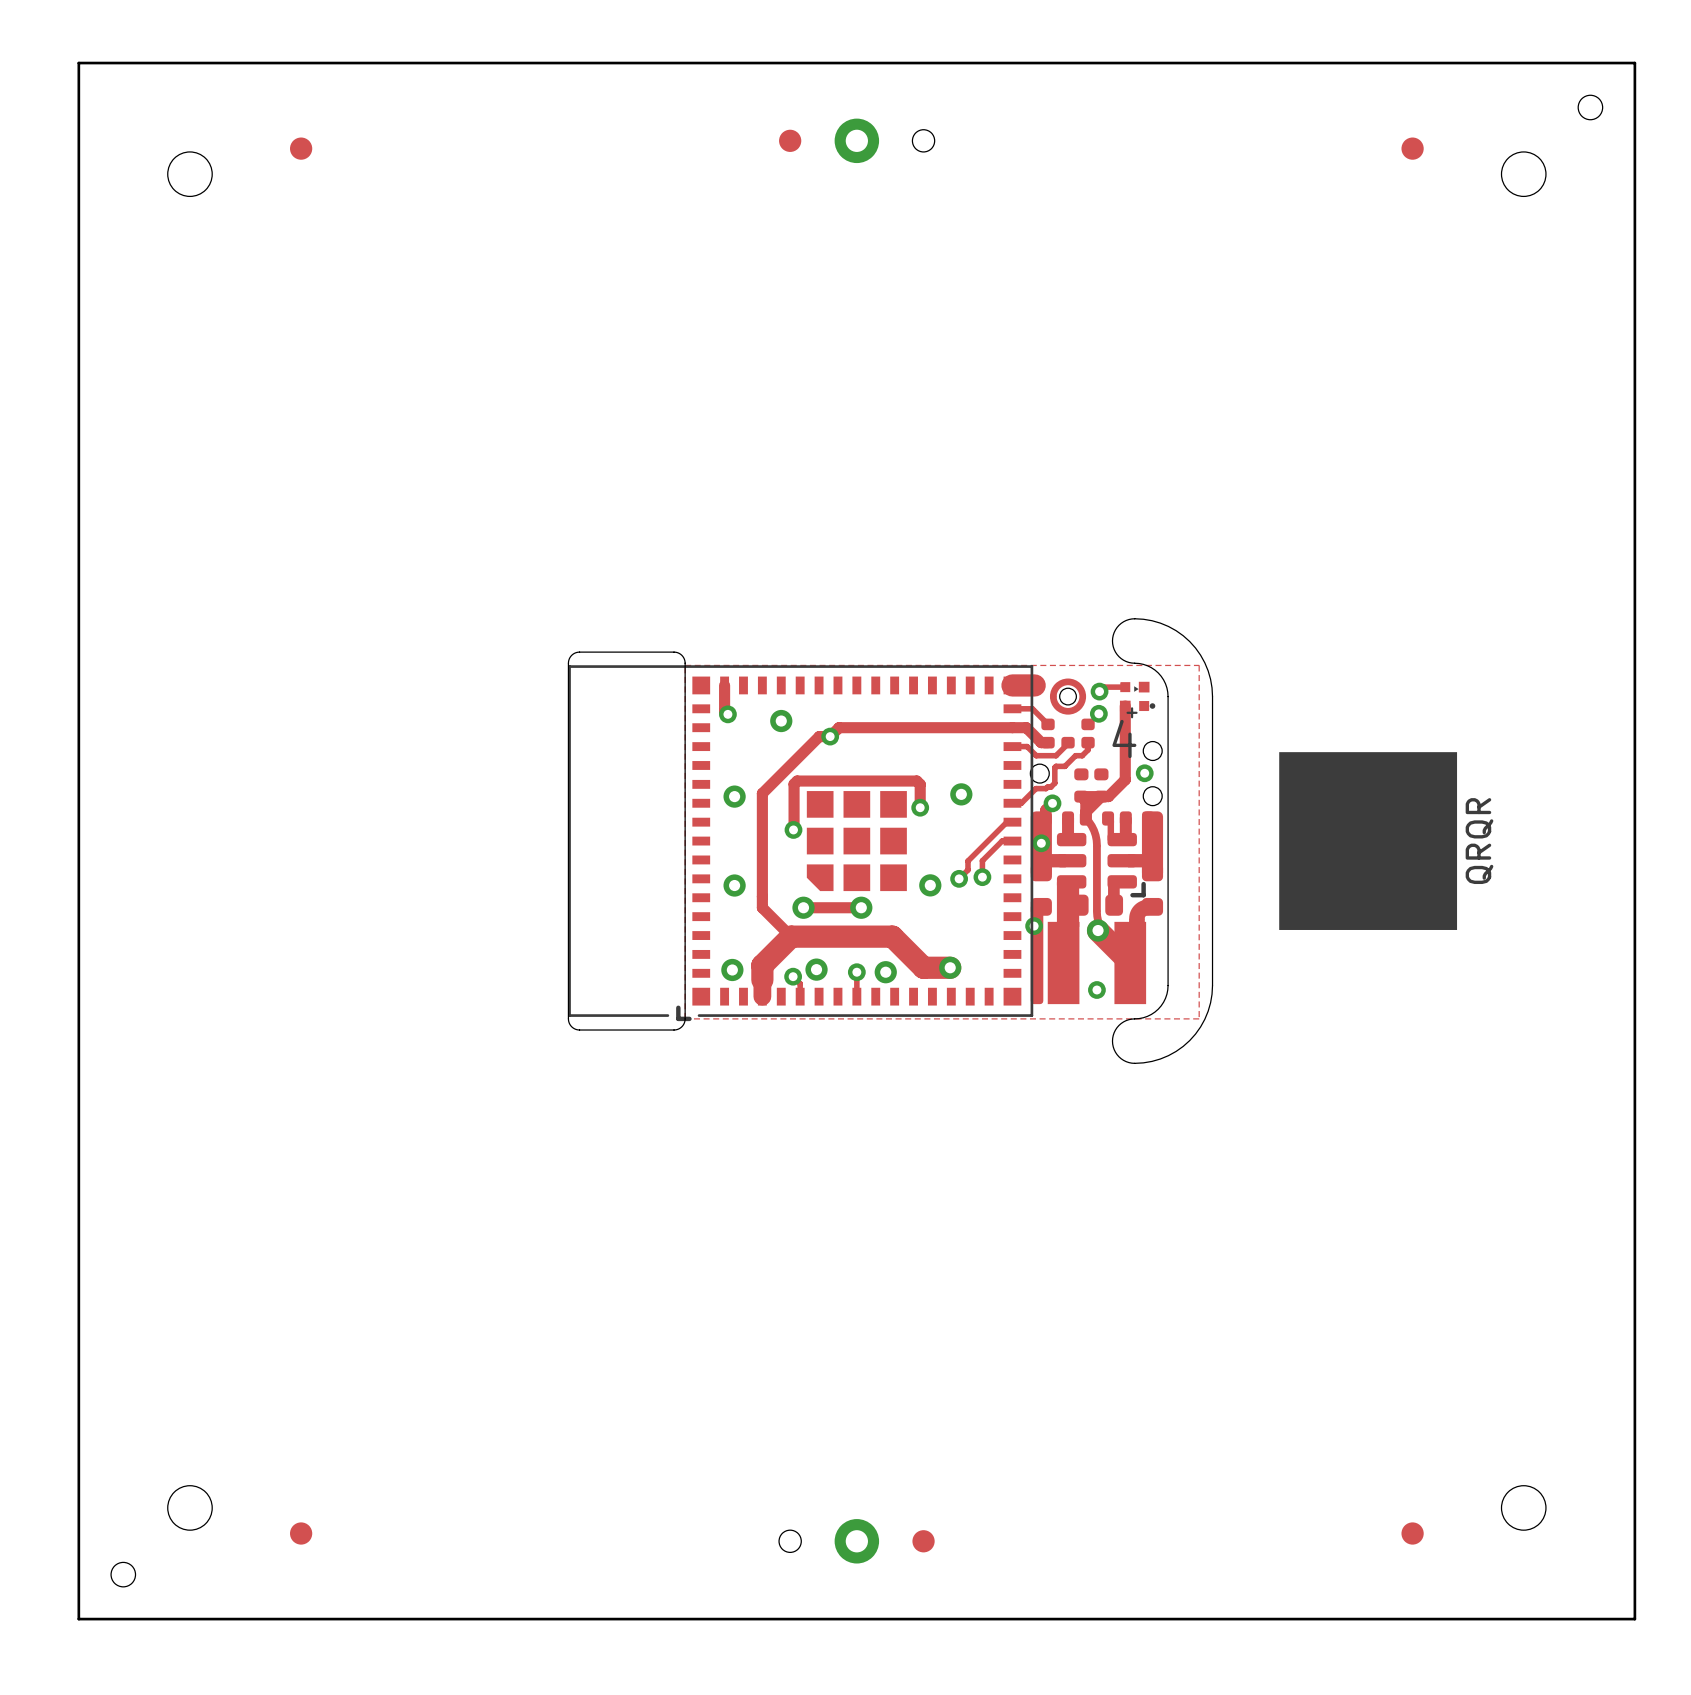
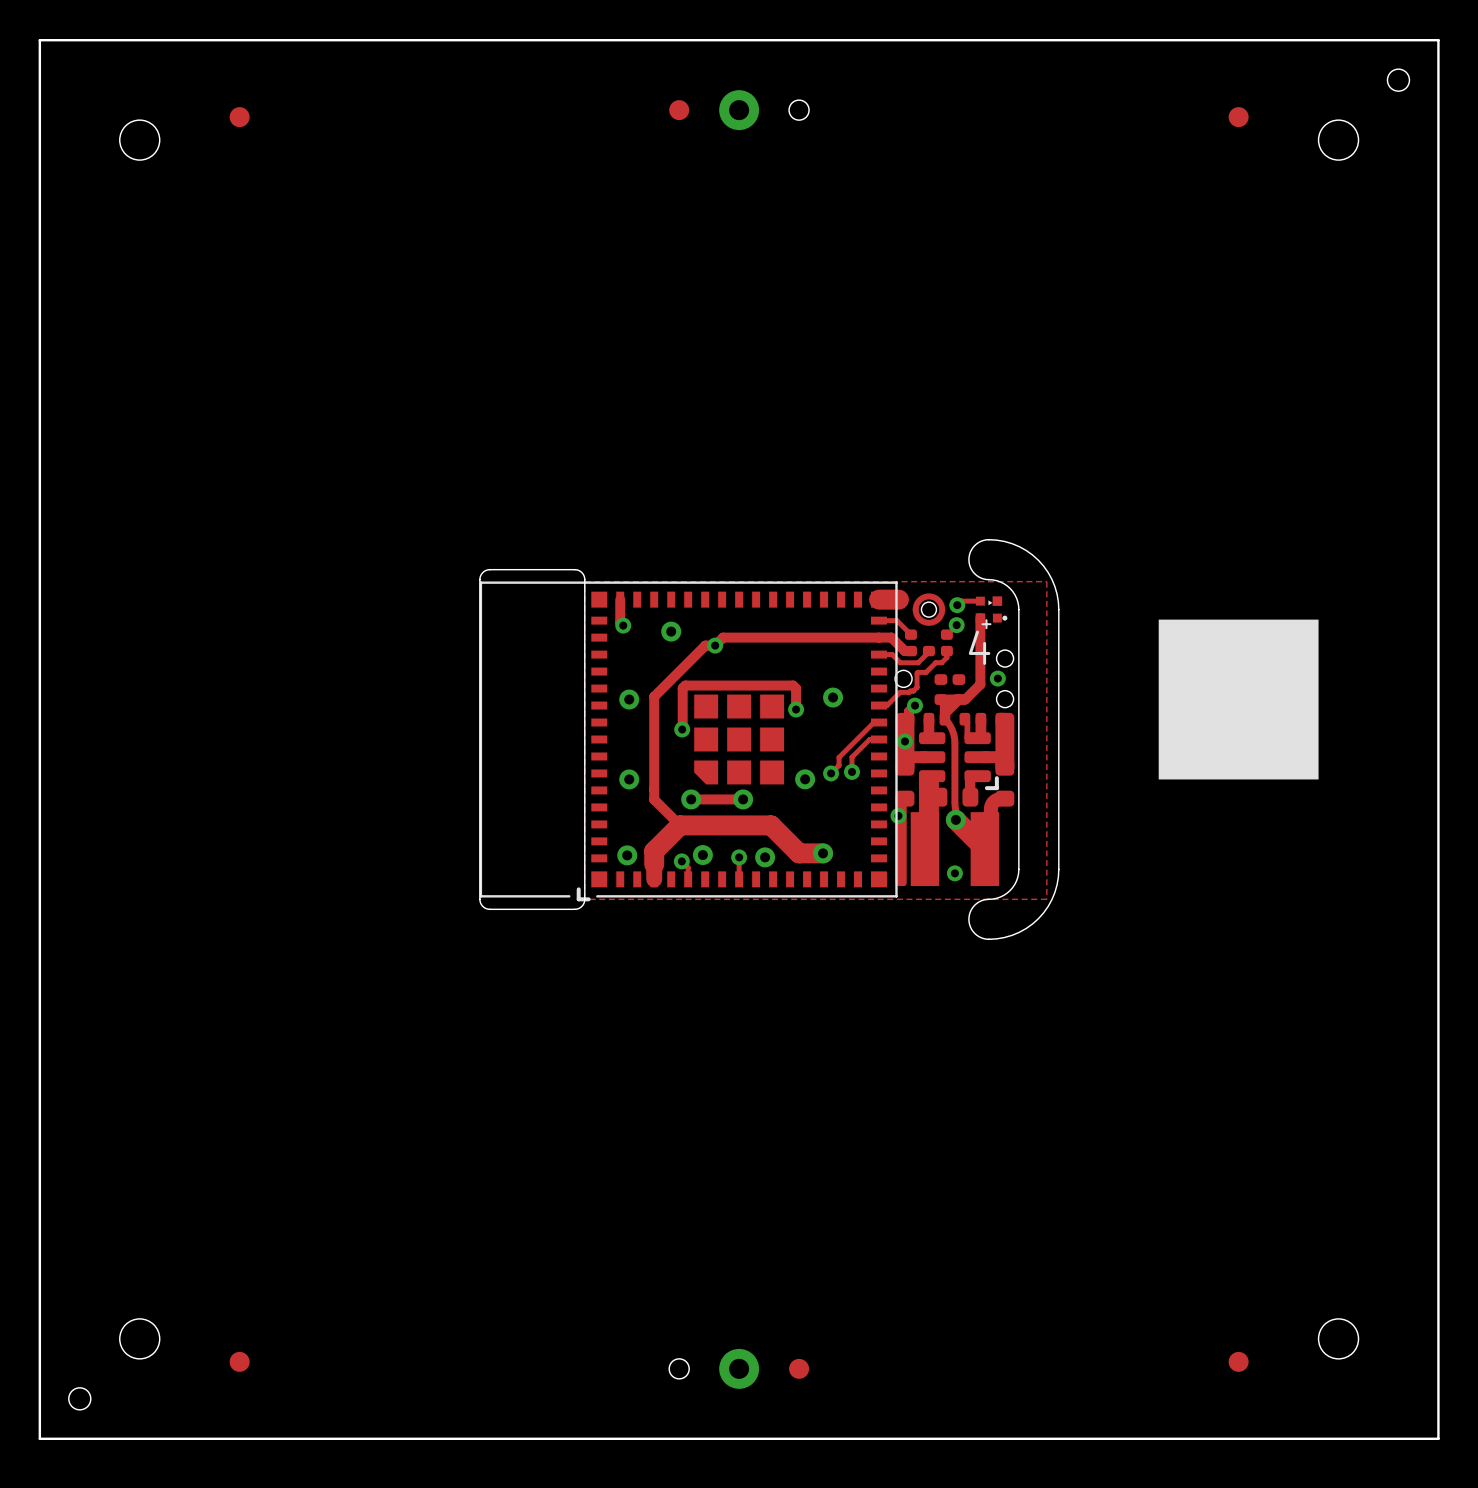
drawing position: (1368, 841) -> (1238, 699)
text: QRQR (1479, 841) -> none

